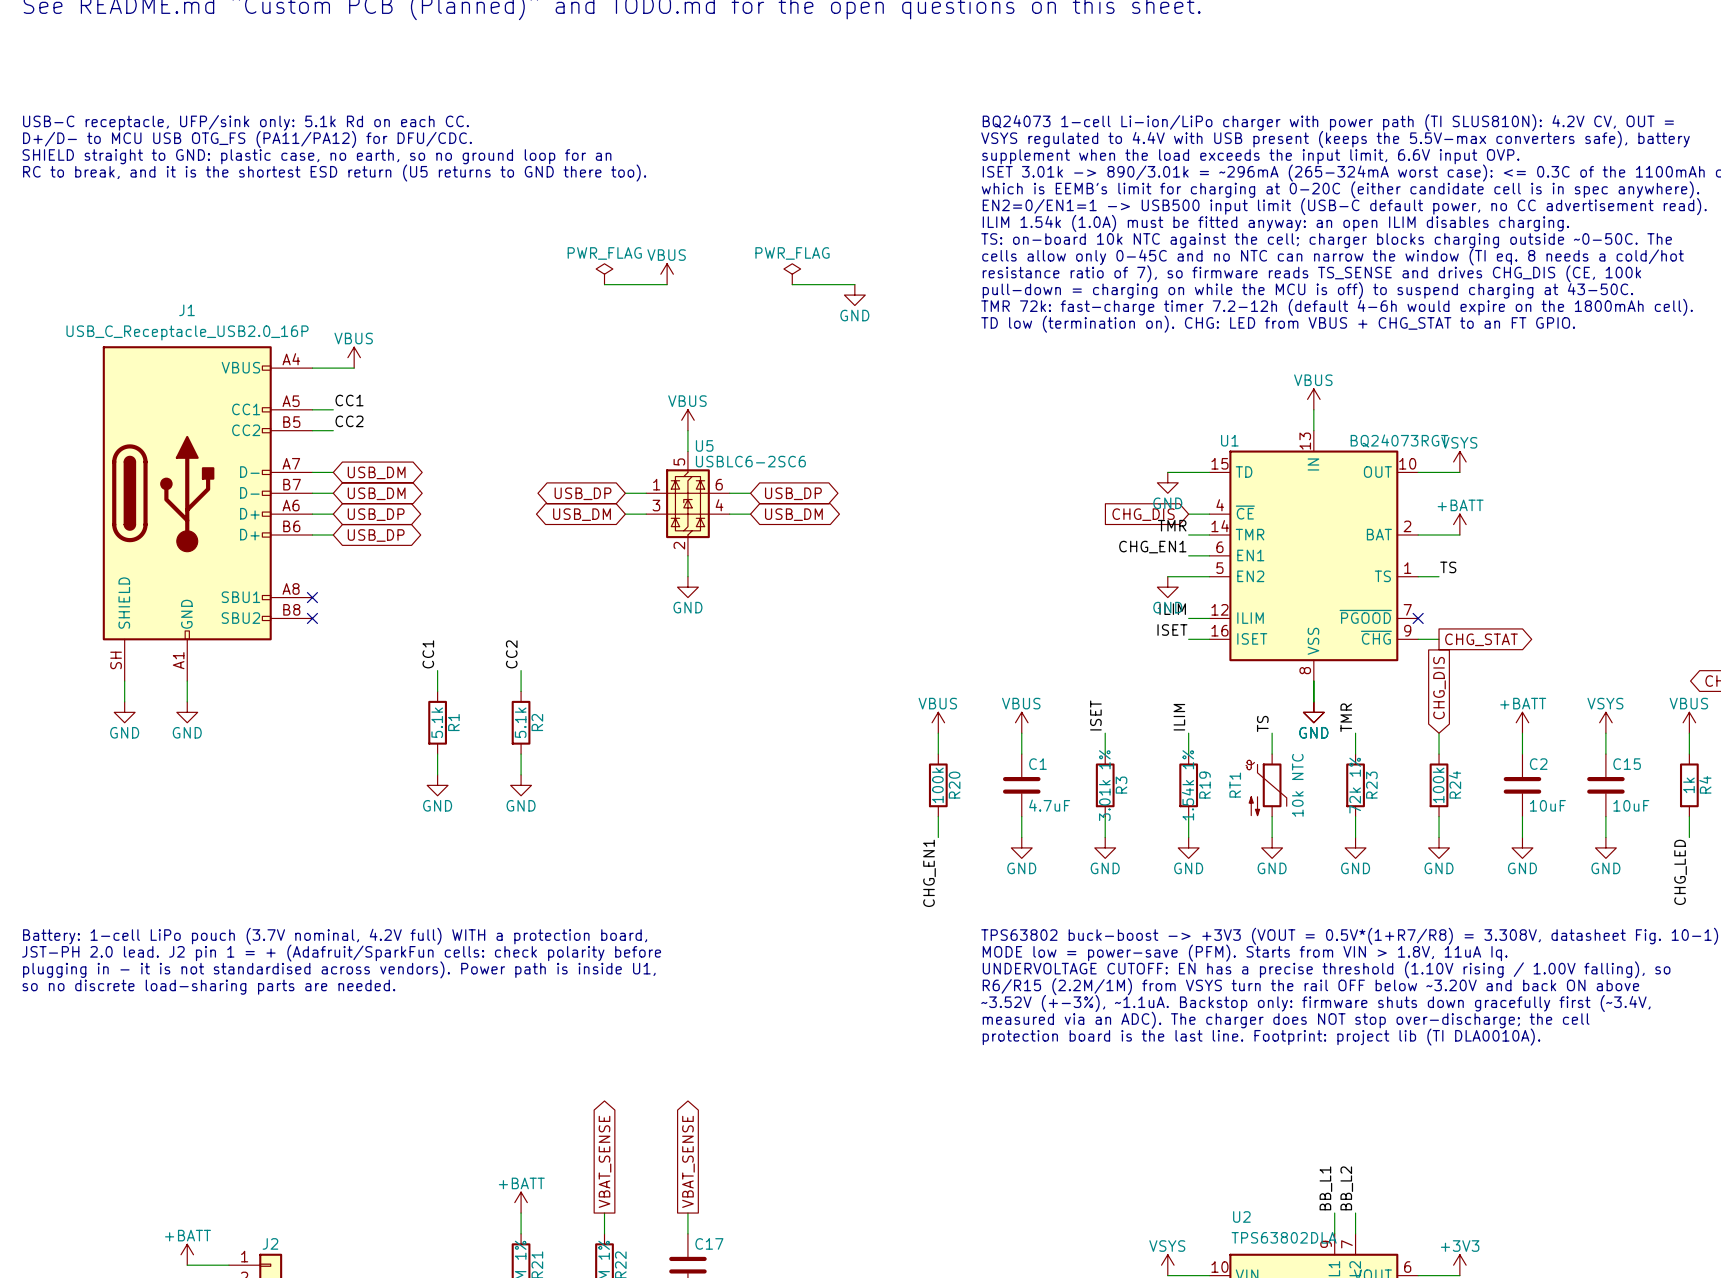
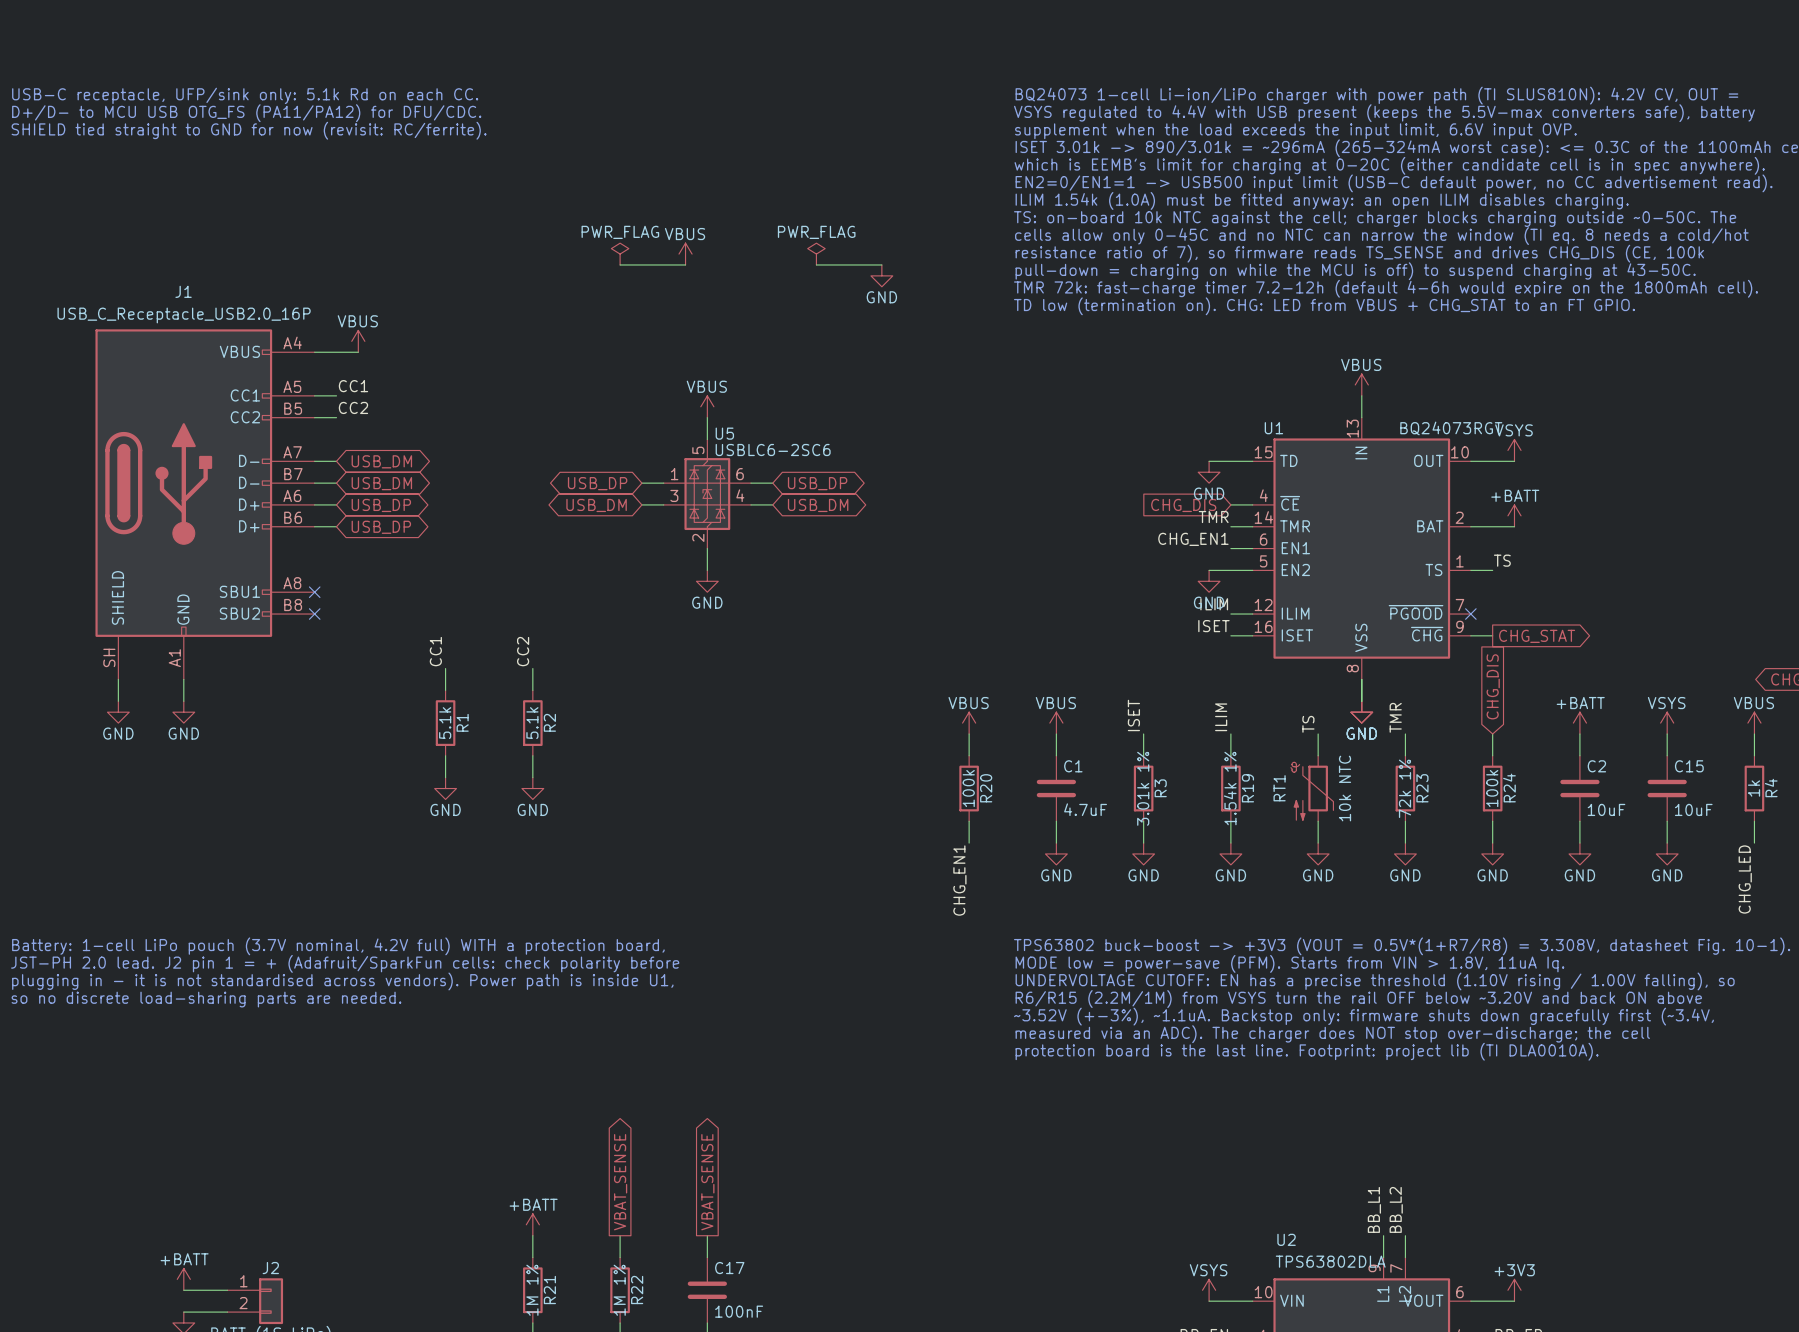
text: SHIELD straight to GND: plastic case, no earth, so no ground loop for an (316, 156) -> SHIELD tied straight to GND for now (revisit: RC/ferrite). (249, 130)
text: RC to break, and it is the shortest ESD return (U5 returns to GND there too). (334, 173) -> none

